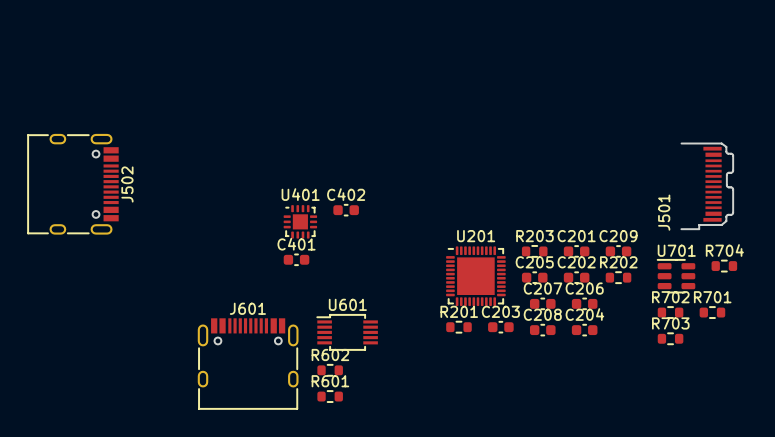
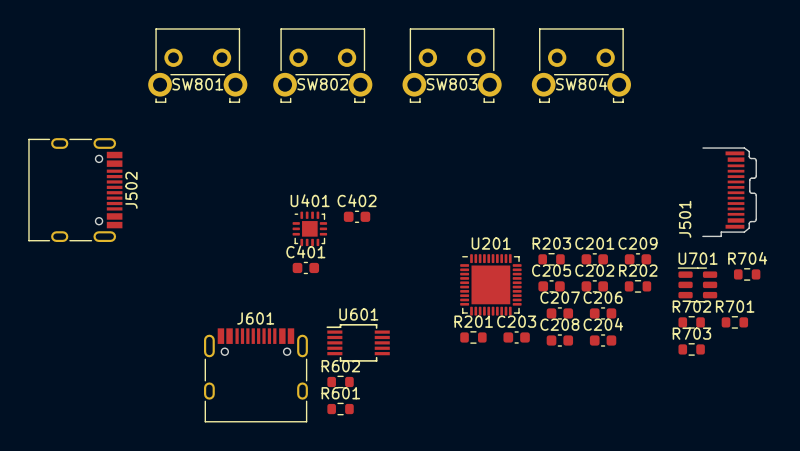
SW801: none -> (197, 65)
SW802: none -> (322, 65)
SW803: none -> (452, 65)
SW804: none -> (581, 65)

